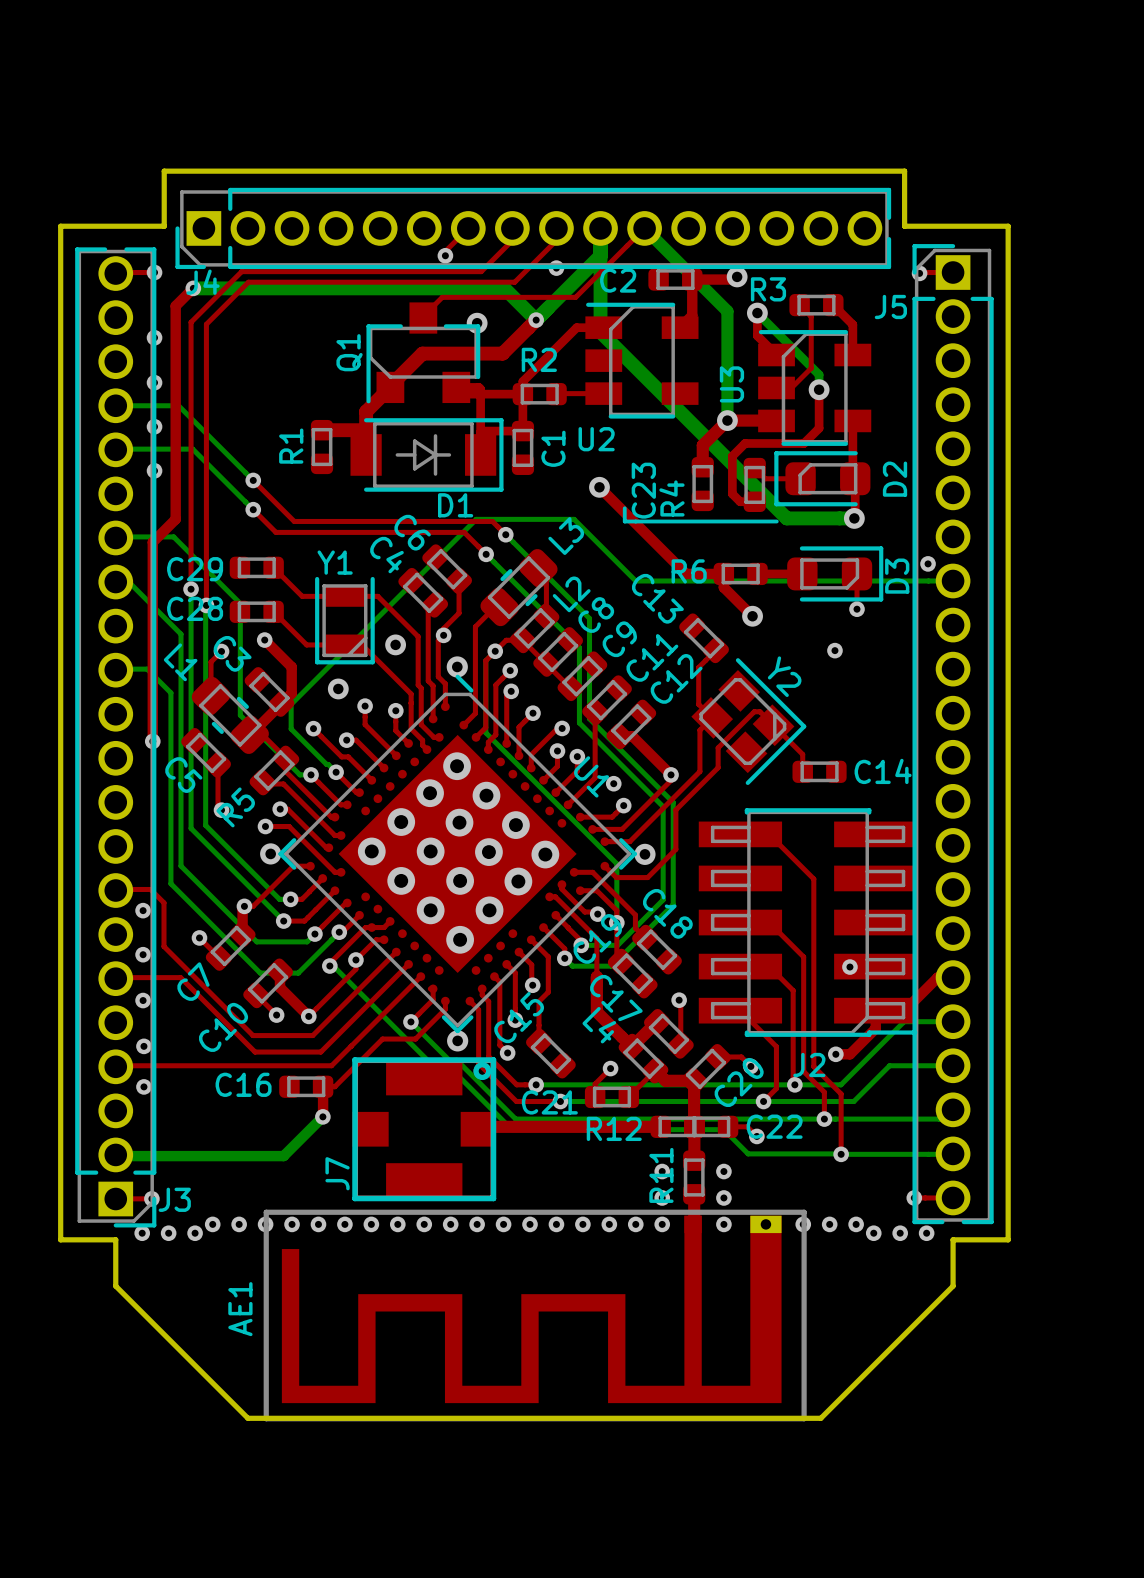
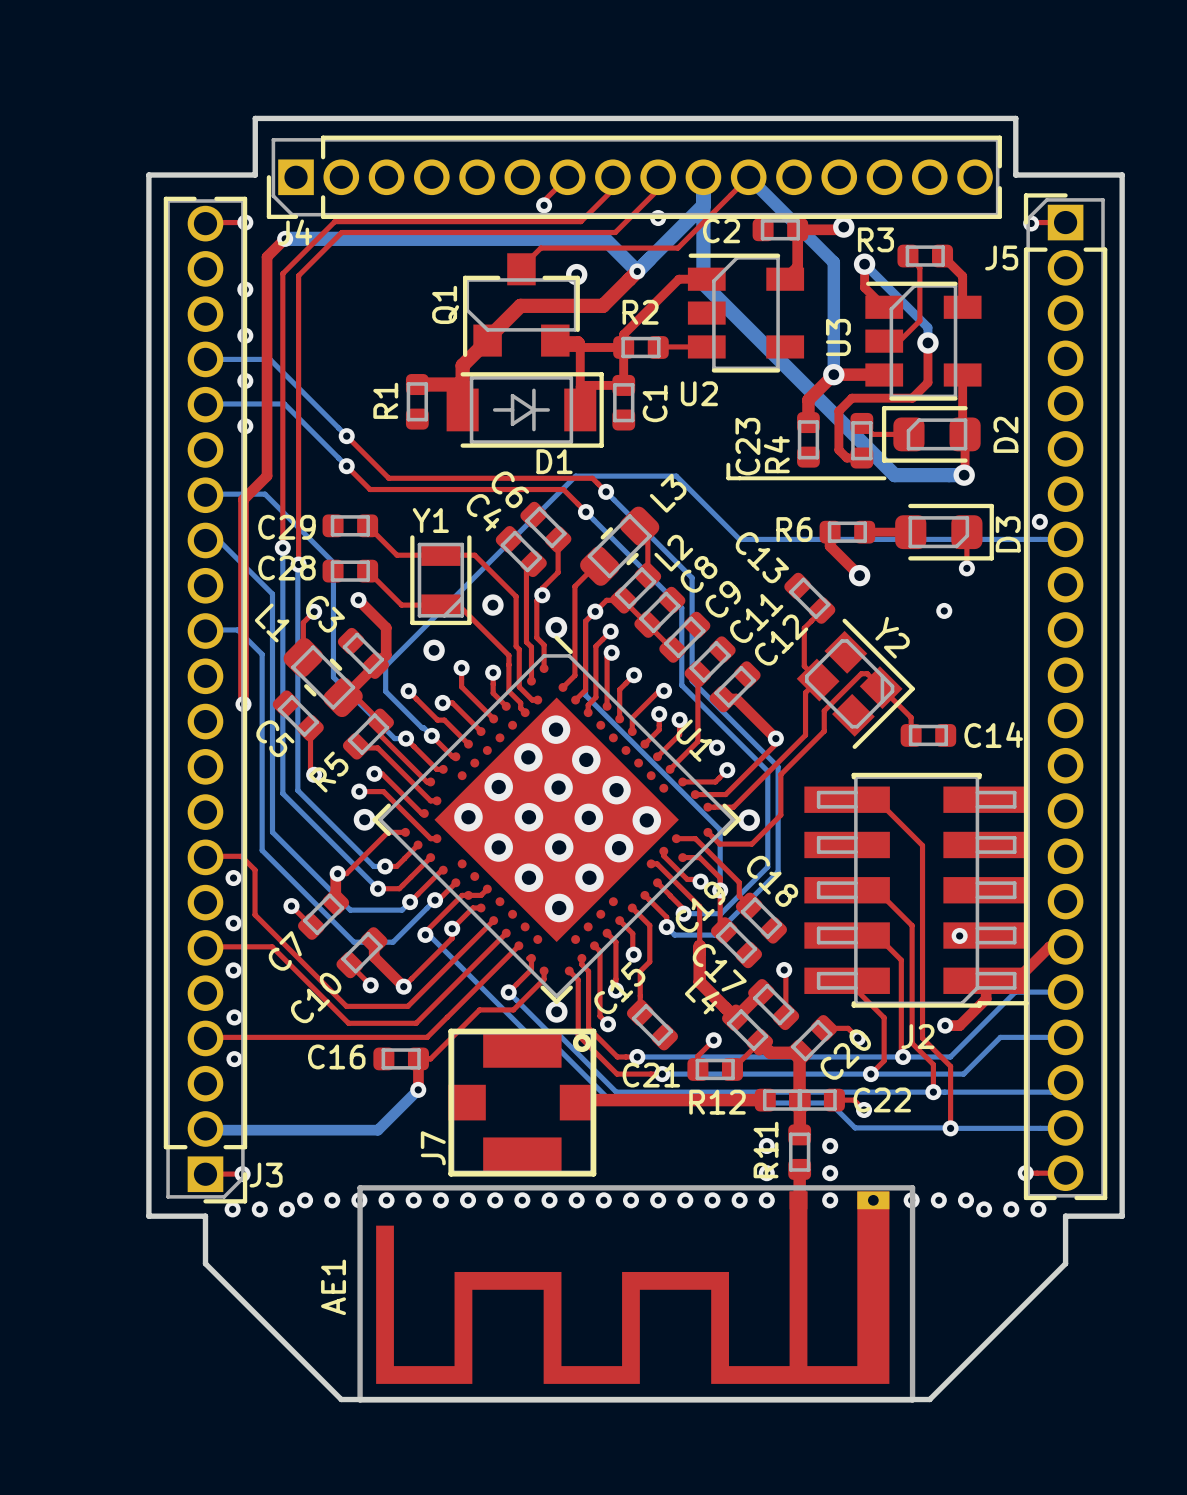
top track: (599, 487) (686, 573) (723, 573) -> none
via: (599, 487) -> none

